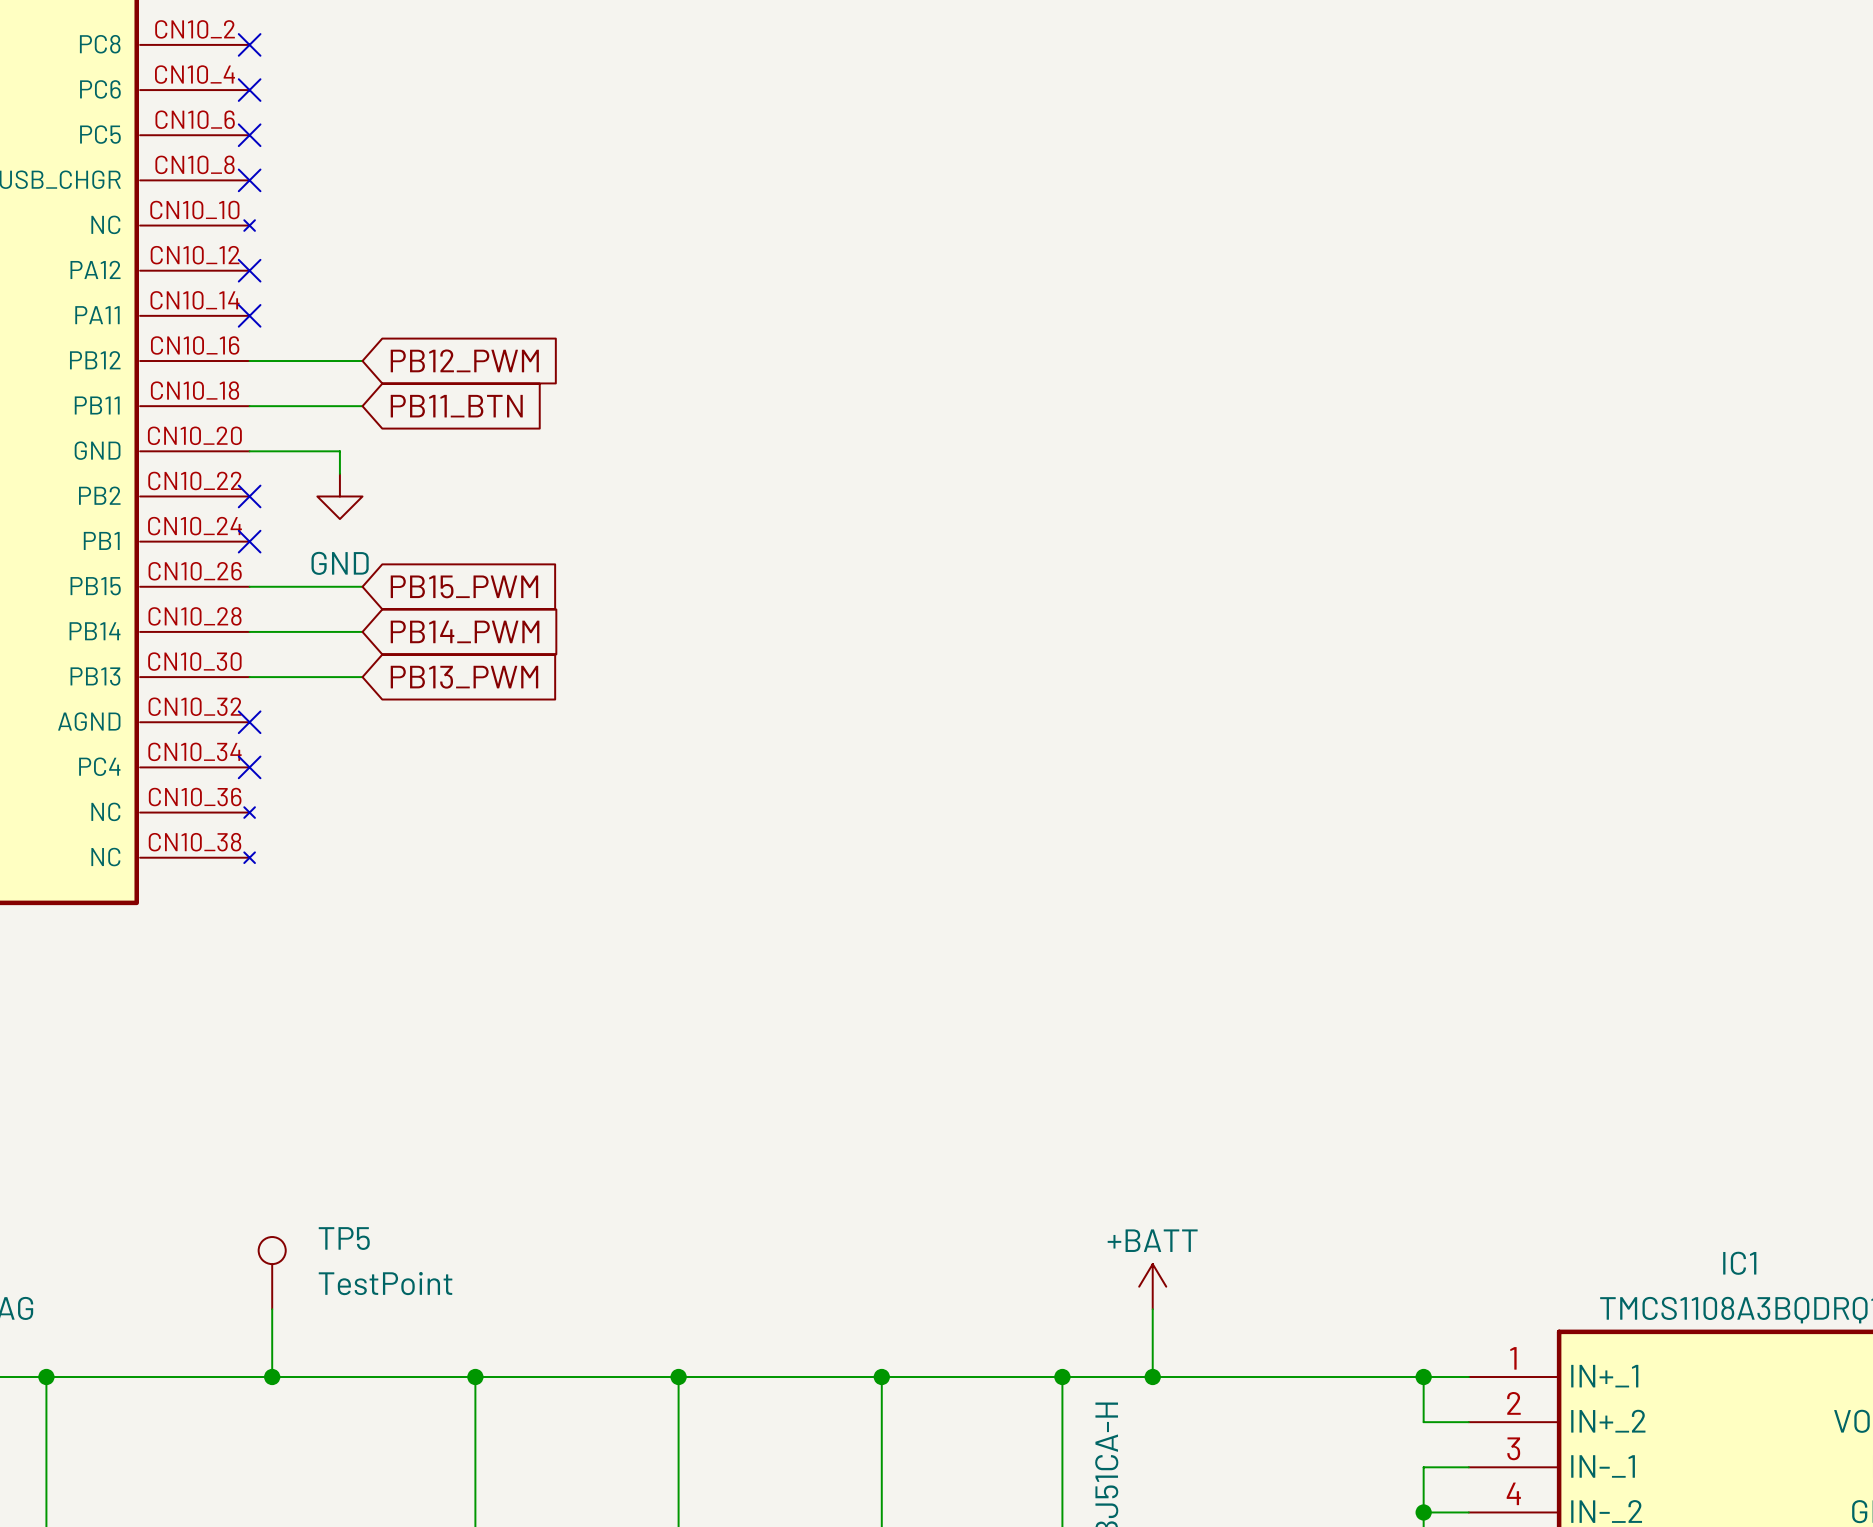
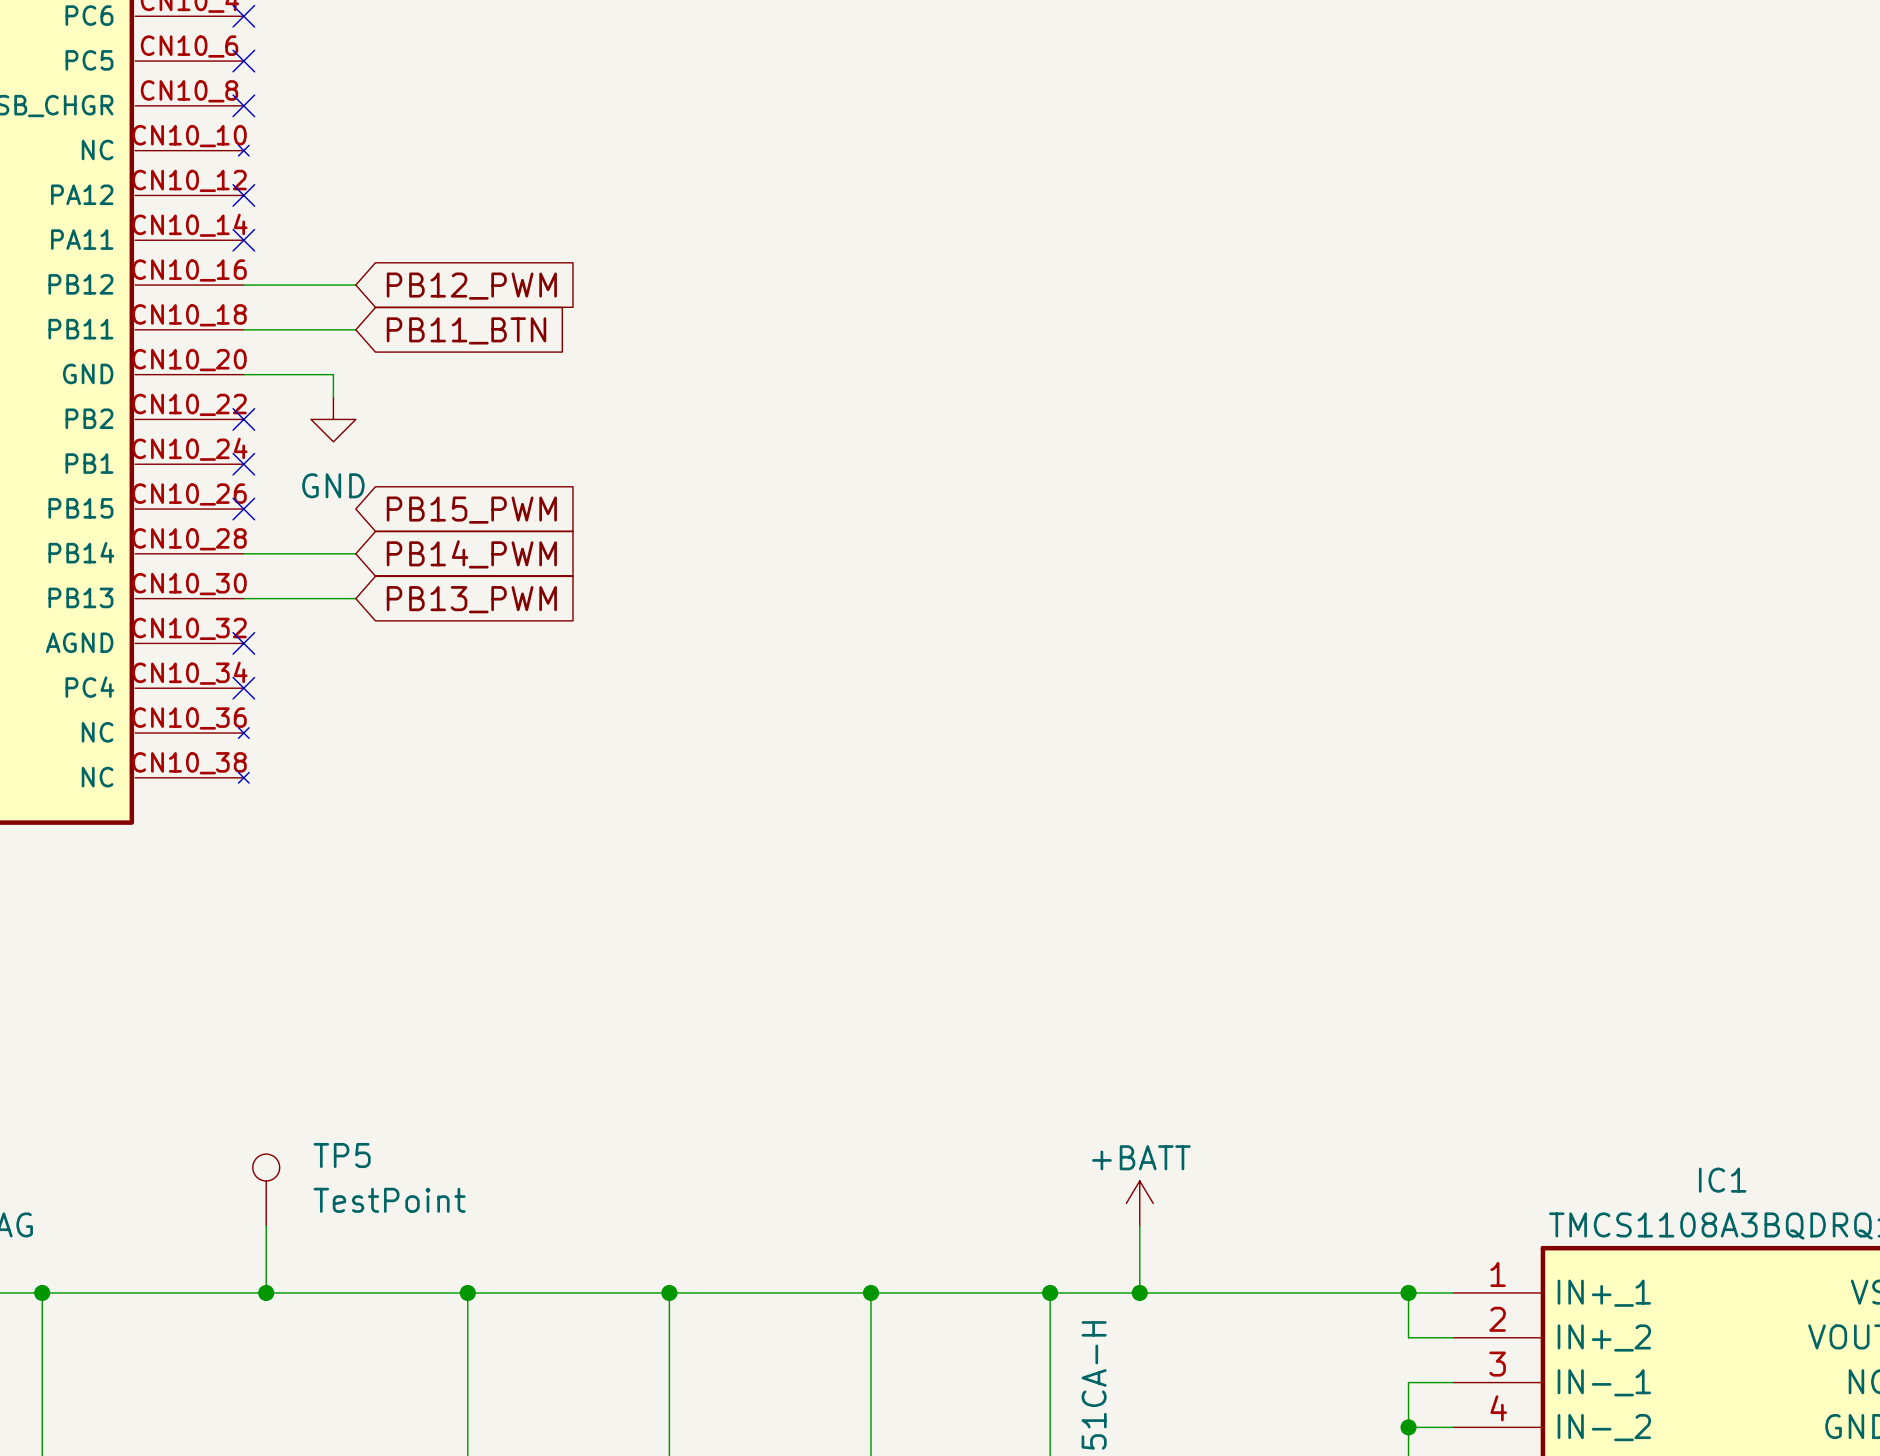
wire: (249, 586) (362, 586) -> none
no-connect mark: none -> (243, 509)

